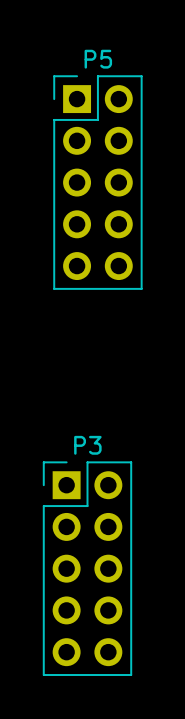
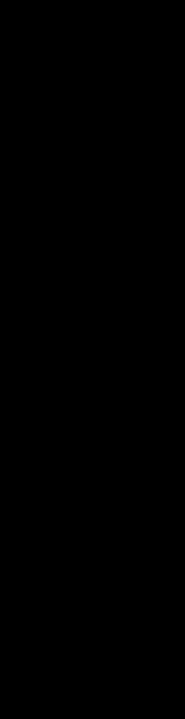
P5: (97, 182) -> none
P3: (87, 568) -> none

